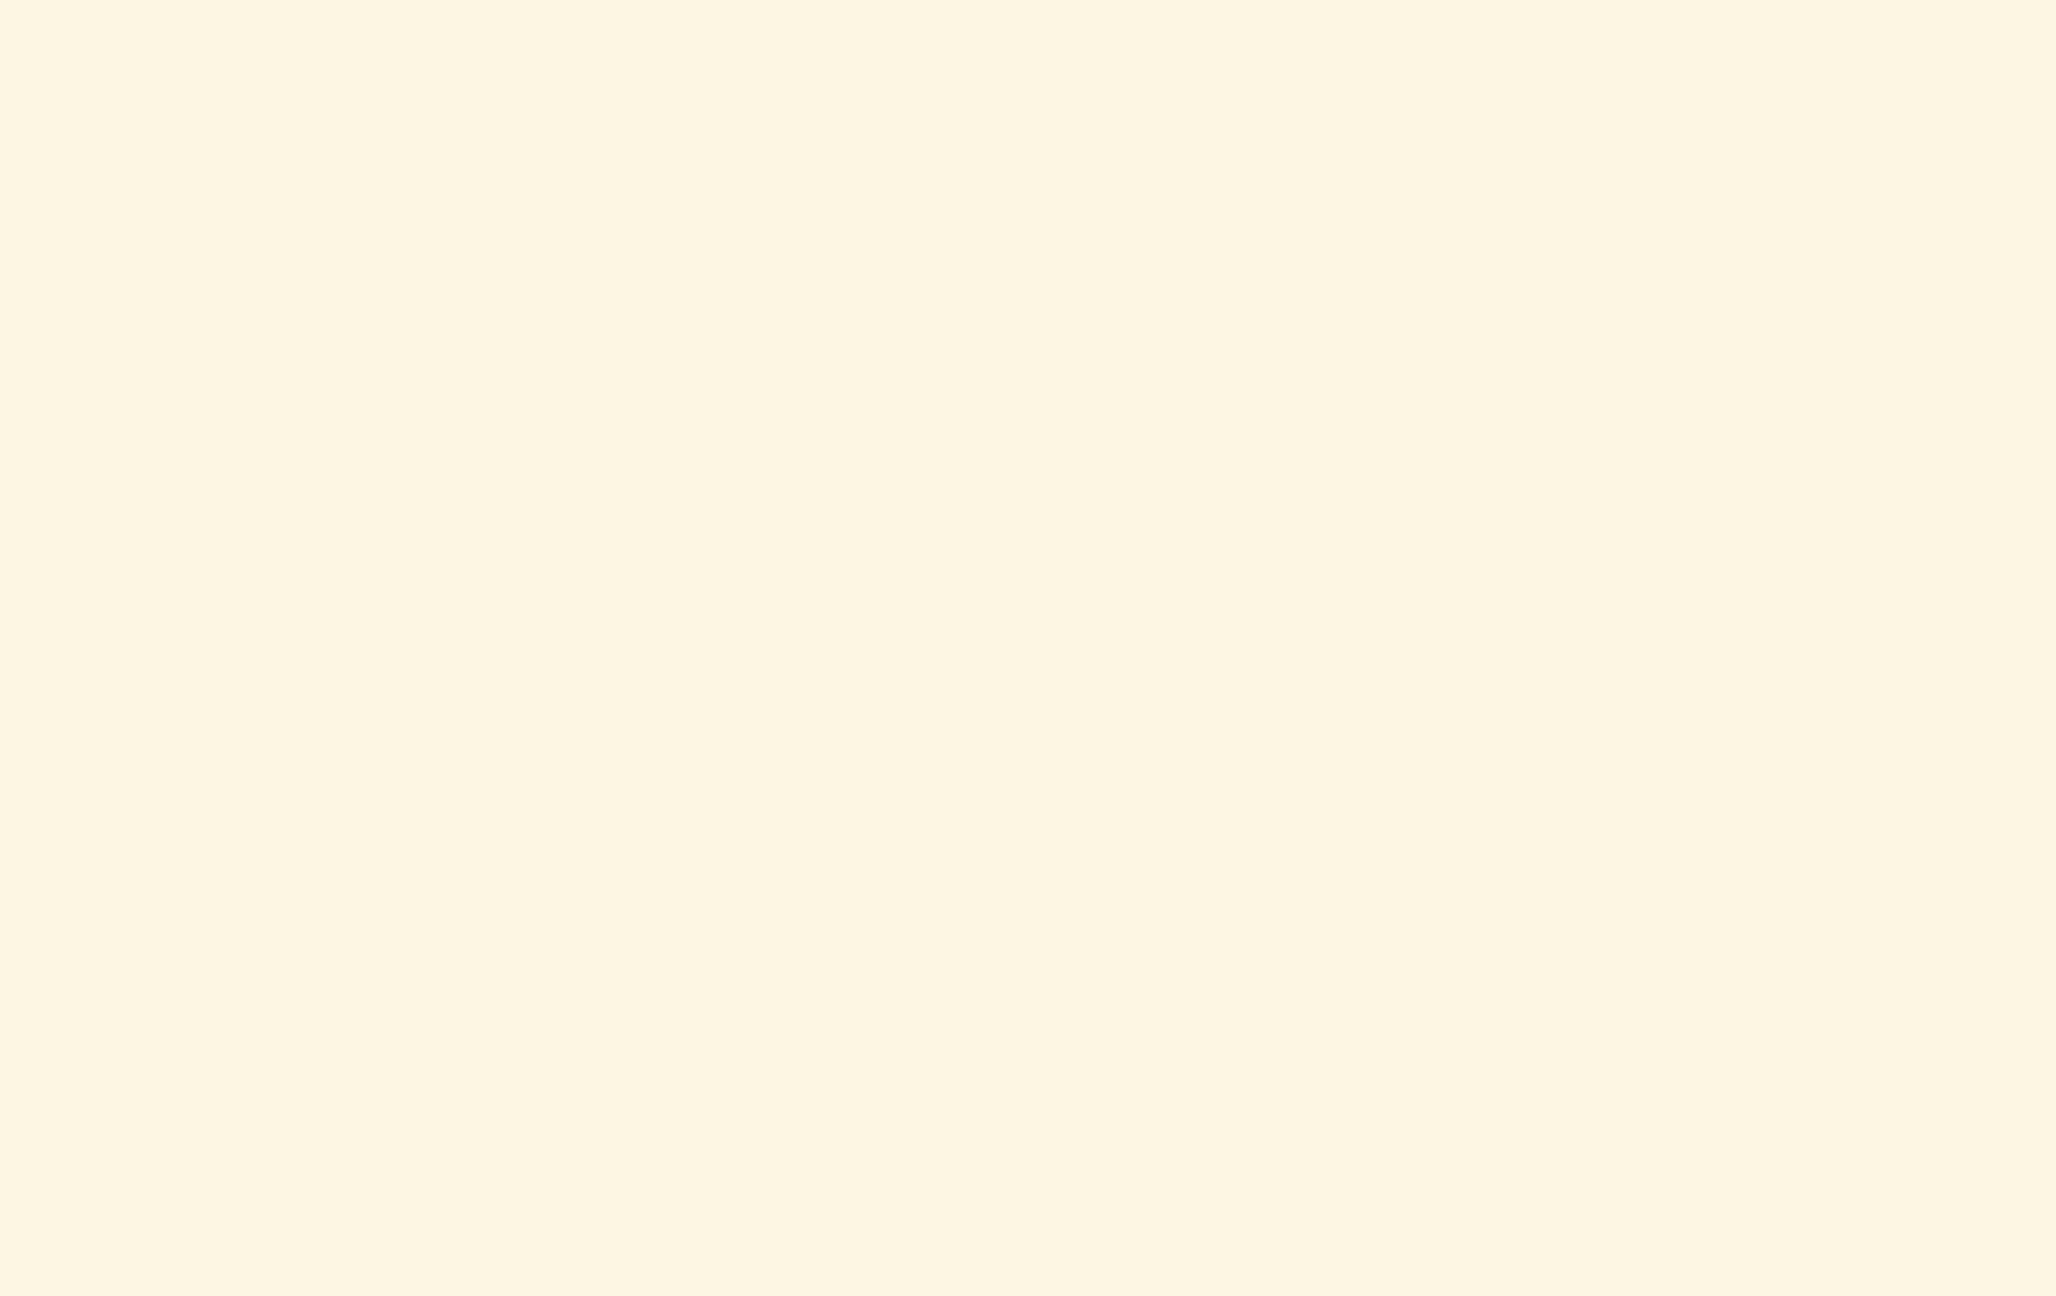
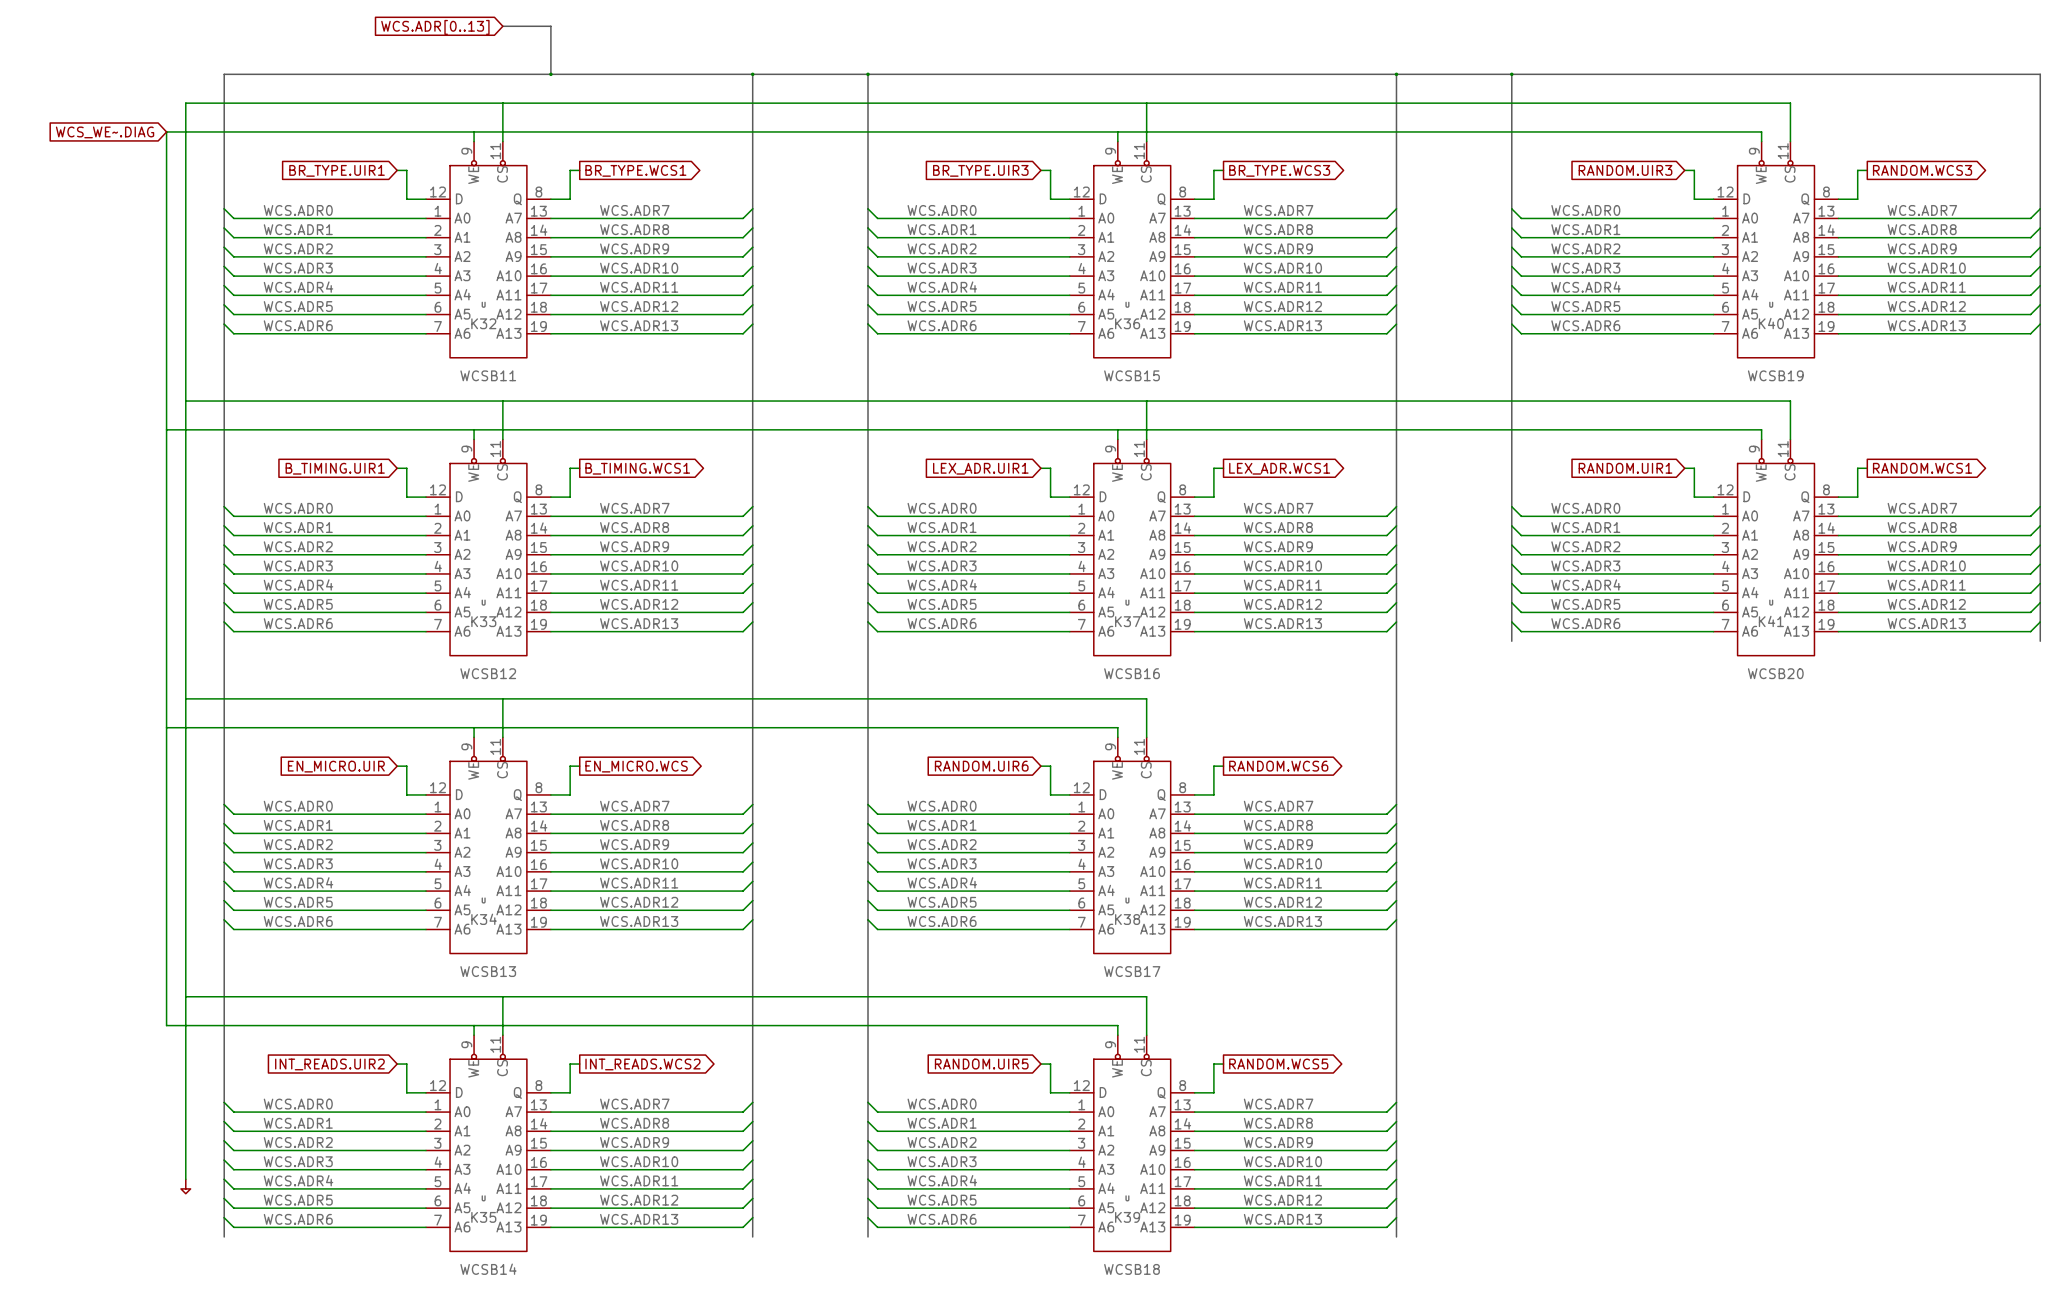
bus: none -> (502, 26) (550, 26) (550, 74)
global label: none -> WCS.ADR[0..13] (435, 27)
junction: none -> (550, 74)
bus: none -> (752, 74) (752, 1236)
junction: none -> (752, 74)
bus: none -> (868, 74) (868, 1236)
junction: none -> (868, 74)
bus: none -> (1396, 74) (1396, 1236)
junction: none -> (1396, 74)
bus: none -> (1511, 74) (1511, 641)
junction: none -> (1511, 74)
wire: none -> (502, 103) (502, 141)
wire: none -> (1146, 103) (1146, 141)
wire: none -> (474, 131) (474, 141)
wire: none -> (1117, 131) (1117, 141)
global label: none -> WCS_WE~.DIAG (105, 132)
wire: none -> (1761, 141) (1761, 131) (166, 131) (166, 1025) (1117, 1025) (1117, 1035)
wire: none -> (1790, 141) (1790, 103) (185, 103) (185, 1179)
global label: none -> BR_TYPE.UIR1 (337, 170)
wire: none -> (397, 170) (406, 170) (406, 199) (426, 199)
wire: none -> (579, 170) (570, 170) (570, 199) (550, 199)
global label: none -> BR_TYPE.WCS1 (635, 170)
global label: none -> BR_TYPE.UIR3 (980, 170)
wire: none -> (1040, 170) (1050, 170) (1050, 199) (1069, 199)
wire: none -> (1223, 170) (1213, 170) (1213, 199) (1194, 199)
global label: none -> BR_TYPE.WCS3 (1279, 170)
global label: none -> RANDOM.UIR3 (1625, 170)
wire: none -> (1684, 170) (1694, 170) (1694, 199) (1713, 199)
wire: none -> (1867, 170) (1857, 170) (1857, 199) (1838, 199)
global label: none -> RANDOM.WCS3 (1922, 170)
wire: none -> (224, 208) (233, 218) (426, 218)
wire: none -> (752, 208) (743, 218) (550, 218)
wire: none -> (868, 208) (877, 218) (1069, 218)
wire: none -> (1396, 208) (1386, 218) (1194, 218)
wire: none -> (1511, 208) (1521, 218) (1713, 218)
wire: none -> (2040, 208) (2030, 218) (1838, 218)
label: none -> WCS.ADR0 (298, 210)
label: none -> WCS.ADR7 (634, 210)
label: none -> WCS.ADR0 (942, 210)
label: none -> WCS.ADR7 (1278, 210)
label: none -> WCS.ADR0 (1585, 210)
label: none -> WCS.ADR7 (1922, 210)
wire: none -> (224, 228) (233, 237) (426, 237)
wire: none -> (752, 228) (743, 237) (550, 237)
wire: none -> (868, 228) (877, 237) (1069, 237)
wire: none -> (1396, 228) (1386, 237) (1194, 237)
wire: none -> (1511, 228) (1521, 237) (1713, 237)
wire: none -> (2040, 228) (2030, 237) (1838, 237)
label: none -> WCS.ADR1 (298, 229)
label: none -> WCS.ADR8 (634, 229)
label: none -> WCS.ADR1 (942, 229)
label: none -> WCS.ADR8 (1278, 229)
label: none -> WCS.ADR1 (1585, 229)
label: none -> WCS.ADR8 (1922, 229)
wire: none -> (224, 247) (233, 256) (426, 256)
wire: none -> (752, 247) (743, 256) (550, 256)
wire: none -> (868, 247) (877, 256) (1069, 256)
wire: none -> (1396, 247) (1386, 256) (1194, 256)
wire: none -> (1511, 247) (1521, 256) (1713, 256)
wire: none -> (2040, 247) (2030, 256) (1838, 256)
label: none -> WCS.ADR2 (298, 248)
label: none -> WCS.ADR9 (634, 248)
label: none -> WCS.ADR2 (942, 248)
label: none -> WCS.ADR9 (1278, 248)
label: none -> WCS.ADR2 (1585, 248)
label: none -> WCS.ADR9 (1922, 248)
part: none -> (488, 249)
part: none -> (1132, 249)
part: none -> (1776, 249)
wire: none -> (224, 266) (233, 276) (426, 276)
wire: none -> (752, 266) (743, 276) (550, 276)
wire: none -> (868, 266) (877, 276) (1069, 276)
wire: none -> (1396, 266) (1386, 276) (1194, 276)
wire: none -> (1511, 266) (1521, 276) (1713, 276)
wire: none -> (2040, 266) (2030, 276) (1838, 276)
label: none -> WCS.ADR3 (298, 268)
label: none -> WCS.ADR10 (639, 268)
label: none -> WCS.ADR3 (942, 268)
label: none -> WCS.ADR10 (1282, 268)
label: none -> WCS.ADR3 (1585, 268)
label: none -> WCS.ADR10 (1926, 268)
wire: none -> (224, 285) (233, 295) (426, 295)
wire: none -> (752, 285) (743, 295) (550, 295)
wire: none -> (868, 285) (877, 295) (1069, 295)
wire: none -> (1396, 285) (1386, 295) (1194, 295)
wire: none -> (1511, 285) (1521, 295) (1713, 295)
wire: none -> (2040, 285) (2030, 295) (1838, 295)
label: none -> WCS.ADR4 (298, 287)
label: none -> WCS.ADR11 (639, 287)
label: none -> WCS.ADR4 (942, 287)
label: none -> WCS.ADR11 (1282, 287)
label: none -> WCS.ADR4 (1586, 287)
label: none -> WCS.ADR11 (1926, 287)
wire: none -> (224, 304) (233, 314) (426, 314)
wire: none -> (752, 304) (743, 314) (550, 314)
wire: none -> (868, 304) (877, 314) (1069, 314)
wire: none -> (1396, 304) (1386, 314) (1194, 314)
wire: none -> (1511, 304) (1521, 314) (1713, 314)
wire: none -> (2040, 304) (2030, 314) (1838, 314)
label: none -> WCS.ADR5 (298, 306)
label: none -> WCS.ADR12 (639, 306)
label: none -> WCS.ADR5 (942, 306)
label: none -> WCS.ADR12 (1282, 306)
label: none -> WCS.ADR5 (1585, 306)
label: none -> WCS.ADR12 (1926, 306)
wire: none -> (224, 324) (233, 333) (426, 333)
wire: none -> (752, 324) (743, 333) (550, 333)
wire: none -> (868, 324) (877, 333) (1069, 333)
wire: none -> (1396, 324) (1386, 333) (1194, 333)
wire: none -> (1511, 324) (1521, 333) (1713, 333)
wire: none -> (2040, 324) (2030, 333) (1838, 333)
label: none -> WCS.ADR6 (298, 325)
label: none -> WCS.ADR13 (639, 325)
label: none -> WCS.ADR6 (942, 325)
label: none -> WCS.ADR13 (1282, 325)
label: none -> WCS.ADR6 (1585, 325)
label: none -> WCS.ADR13 (1926, 325)
wire: none -> (185, 401) (1790, 401) (1790, 439)
wire: none -> (502, 401) (502, 439)
wire: none -> (1146, 401) (1146, 439)
wire: none -> (166, 429) (1761, 429) (1761, 439)
wire: none -> (474, 429) (474, 439)
wire: none -> (1117, 429) (1117, 439)
global label: none -> B_TIMING.UIR1 (335, 468)
wire: none -> (397, 468) (406, 468) (406, 497) (426, 497)
wire: none -> (579, 468) (570, 468) (570, 497) (550, 497)
global label: none -> B_TIMING.WCS1 (637, 468)
global label: none -> LEX_ADR.UIR1 (980, 468)
wire: none -> (1040, 468) (1050, 468) (1050, 497) (1069, 497)
wire: none -> (1223, 468) (1213, 468) (1213, 497) (1194, 497)
global label: none -> LEX_ADR.WCS1 (1279, 468)
global label: none -> RANDOM.UIR1 (1625, 468)
wire: none -> (1684, 468) (1694, 468) (1694, 497) (1713, 497)
wire: none -> (1867, 468) (1857, 468) (1857, 497) (1838, 497)
global label: none -> RANDOM.WCS1 (1922, 468)
wire: none -> (224, 506) (233, 516) (426, 516)
wire: none -> (752, 506) (743, 516) (550, 516)
wire: none -> (868, 506) (877, 516) (1069, 516)
wire: none -> (1396, 506) (1386, 516) (1194, 516)
wire: none -> (1511, 506) (1521, 516) (1713, 516)
wire: none -> (2040, 506) (2030, 516) (1838, 516)
label: none -> WCS.ADR0 (298, 508)
label: none -> WCS.ADR7 (634, 508)
label: none -> WCS.ADR0 (942, 508)
label: none -> WCS.ADR7 (1278, 508)
label: none -> WCS.ADR0 (1585, 508)
label: none -> WCS.ADR7 (1922, 508)
wire: none -> (224, 525) (233, 535) (426, 535)
wire: none -> (752, 525) (743, 535) (550, 535)
wire: none -> (868, 525) (877, 535) (1069, 535)
wire: none -> (1396, 525) (1386, 535) (1194, 535)
wire: none -> (1511, 525) (1521, 535) (1713, 535)
wire: none -> (2040, 525) (2030, 535) (1838, 535)
label: none -> WCS.ADR1 (298, 527)
label: none -> WCS.ADR8 (634, 527)
label: none -> WCS.ADR1 (942, 527)
label: none -> WCS.ADR8 (1278, 527)
label: none -> WCS.ADR1 (1585, 527)
label: none -> WCS.ADR8 (1922, 527)
wire: none -> (224, 545) (233, 554) (426, 554)
wire: none -> (752, 545) (743, 554) (550, 554)
wire: none -> (868, 545) (877, 554) (1069, 554)
wire: none -> (1396, 545) (1386, 554) (1194, 554)
wire: none -> (1511, 545) (1521, 554) (1713, 554)
wire: none -> (2040, 545) (2030, 554) (1838, 554)
label: none -> WCS.ADR2 (298, 546)
label: none -> WCS.ADR9 (634, 546)
label: none -> WCS.ADR2 (942, 546)
label: none -> WCS.ADR9 (1278, 546)
label: none -> WCS.ADR2 (1585, 546)
label: none -> WCS.ADR9 (1922, 546)
part: none -> (488, 547)
part: none -> (1132, 547)
part: none -> (1776, 547)
wire: none -> (224, 564) (233, 573) (426, 573)
wire: none -> (752, 564) (743, 573) (550, 573)
wire: none -> (868, 564) (877, 573) (1069, 573)
wire: none -> (1396, 564) (1386, 573) (1194, 573)
wire: none -> (1511, 564) (1521, 573) (1713, 573)
wire: none -> (2040, 564) (2030, 573) (1838, 573)
label: none -> WCS.ADR3 (298, 565)
label: none -> WCS.ADR10 (639, 565)
label: none -> WCS.ADR3 (942, 565)
label: none -> WCS.ADR10 (1282, 565)
label: none -> WCS.ADR3 (1585, 565)
label: none -> WCS.ADR10 (1926, 565)
wire: none -> (224, 583) (233, 593) (426, 593)
wire: none -> (752, 583) (743, 593) (550, 593)
wire: none -> (868, 583) (877, 593) (1069, 593)
wire: none -> (1396, 583) (1386, 593) (1194, 593)
wire: none -> (1511, 583) (1521, 593) (1713, 593)
wire: none -> (2040, 583) (2030, 593) (1838, 593)
label: none -> WCS.ADR4 (298, 584)
label: none -> WCS.ADR4 (942, 584)
label: none -> WCS.ADR4 (1586, 584)
label: none -> WCS.ADR11 (639, 585)
label: none -> WCS.ADR11 (1282, 585)
label: none -> WCS.ADR11 (1926, 585)
wire: none -> (224, 602) (233, 612) (426, 612)
wire: none -> (752, 602) (743, 612) (550, 612)
wire: none -> (868, 602) (877, 612) (1069, 612)
wire: none -> (1396, 602) (1386, 612) (1194, 612)
wire: none -> (1511, 602) (1521, 612) (1713, 612)
wire: none -> (2040, 602) (2030, 612) (1838, 612)
label: none -> WCS.ADR5 (298, 604)
label: none -> WCS.ADR12 (639, 604)
label: none -> WCS.ADR5 (942, 604)
label: none -> WCS.ADR12 (1282, 604)
label: none -> WCS.ADR5 (1585, 604)
label: none -> WCS.ADR12 (1926, 604)
wire: none -> (224, 622) (233, 631) (426, 631)
wire: none -> (752, 622) (743, 631) (550, 631)
wire: none -> (868, 622) (877, 631) (1069, 631)
wire: none -> (1396, 622) (1386, 631) (1194, 631)
wire: none -> (1511, 622) (1521, 631) (1713, 631)
wire: none -> (2040, 622) (2030, 631) (1838, 631)
label: none -> WCS.ADR6 (298, 623)
label: none -> WCS.ADR13 (639, 623)
label: none -> WCS.ADR6 (942, 623)
label: none -> WCS.ADR13 (1282, 623)
label: none -> WCS.ADR6 (1585, 623)
label: none -> WCS.ADR13 (1926, 623)
bus: none -> (2040, 641) (2040, 74) (224, 74) (224, 1236)
wire: none -> (185, 698) (1146, 698) (1146, 737)
wire: none -> (502, 698) (502, 737)
wire: none -> (166, 727) (1117, 727) (1117, 737)
wire: none -> (474, 727) (474, 737)
global label: none -> EN_MICRO.UIR (336, 766)
wire: none -> (397, 766) (406, 766) (406, 794) (426, 794)
wire: none -> (579, 766) (570, 766) (570, 794) (550, 794)
global label: none -> EN_MICRO.WCS (636, 766)
global label: none -> RANDOM.UIR6 (981, 766)
wire: none -> (1040, 766) (1050, 766) (1050, 794) (1069, 794)
wire: none -> (1223, 766) (1213, 766) (1213, 794) (1194, 794)
global label: none -> RANDOM.WCS6 (1278, 766)
wire: none -> (224, 804) (233, 814) (426, 814)
wire: none -> (752, 804) (743, 814) (550, 814)
wire: none -> (868, 804) (877, 814) (1069, 814)
wire: none -> (1396, 804) (1386, 814) (1194, 814)
label: none -> WCS.ADR0 (298, 806)
label: none -> WCS.ADR7 (634, 806)
label: none -> WCS.ADR0 (942, 806)
label: none -> WCS.ADR7 (1278, 806)
wire: none -> (224, 823) (233, 833) (426, 833)
wire: none -> (752, 823) (743, 833) (550, 833)
wire: none -> (868, 823) (877, 833) (1069, 833)
wire: none -> (1396, 823) (1386, 833) (1194, 833)
label: none -> WCS.ADR1 (298, 825)
label: none -> WCS.ADR8 (634, 825)
label: none -> WCS.ADR1 (942, 825)
label: none -> WCS.ADR8 (1278, 825)
wire: none -> (224, 843) (233, 852) (426, 852)
wire: none -> (752, 843) (743, 852) (550, 852)
wire: none -> (868, 843) (877, 852) (1069, 852)
wire: none -> (1396, 843) (1386, 852) (1194, 852)
label: none -> WCS.ADR2 (298, 844)
label: none -> WCS.ADR9 (634, 844)
label: none -> WCS.ADR2 (942, 844)
label: none -> WCS.ADR9 (1278, 844)
part: none -> (488, 845)
part: none -> (1132, 845)
wire: none -> (224, 862) (233, 871) (426, 871)
wire: none -> (752, 862) (743, 871) (550, 871)
wire: none -> (868, 862) (877, 871) (1069, 871)
wire: none -> (1396, 862) (1386, 871) (1194, 871)
label: none -> WCS.ADR3 (298, 863)
label: none -> WCS.ADR10 (639, 863)
label: none -> WCS.ADR3 (942, 863)
label: none -> WCS.ADR10 (1282, 863)
wire: none -> (224, 881) (233, 891) (426, 891)
wire: none -> (752, 881) (743, 891) (550, 891)
wire: none -> (868, 881) (877, 891) (1069, 891)
wire: none -> (1396, 881) (1386, 891) (1194, 891)
label: none -> WCS.ADR4 (298, 882)
label: none -> WCS.ADR4 (942, 882)
label: none -> WCS.ADR11 (639, 883)
label: none -> WCS.ADR11 (1282, 883)
wire: none -> (224, 900) (233, 910) (426, 910)
wire: none -> (752, 900) (743, 910) (550, 910)
wire: none -> (868, 900) (877, 910) (1069, 910)
wire: none -> (1396, 900) (1386, 910) (1194, 910)
label: none -> WCS.ADR5 (298, 902)
label: none -> WCS.ADR12 (639, 902)
label: none -> WCS.ADR5 (942, 902)
label: none -> WCS.ADR12 (1282, 902)
wire: none -> (224, 919) (233, 929) (426, 929)
wire: none -> (752, 919) (743, 929) (550, 929)
wire: none -> (868, 919) (877, 929) (1069, 929)
wire: none -> (1396, 919) (1386, 929) (1194, 929)
label: none -> WCS.ADR6 (298, 921)
label: none -> WCS.ADR13 (639, 921)
label: none -> WCS.ADR6 (942, 921)
label: none -> WCS.ADR13 (1282, 921)
wire: none -> (185, 996) (1146, 996) (1146, 1035)
wire: none -> (502, 996) (502, 1035)
wire: none -> (474, 1025) (474, 1035)
global label: none -> INT_READS.UIR2 (329, 1064)
wire: none -> (397, 1064) (406, 1064) (406, 1092) (426, 1092)
wire: none -> (579, 1064) (570, 1064) (570, 1092) (550, 1092)
global label: none -> INT_READS.WCS2 (642, 1064)
global label: none -> RANDOM.UIR5 (981, 1064)
wire: none -> (1040, 1064) (1050, 1064) (1050, 1092) (1069, 1092)
wire: none -> (1223, 1064) (1213, 1064) (1213, 1092) (1194, 1092)
global label: none -> RANDOM.WCS5 (1278, 1064)
wire: none -> (224, 1102) (233, 1112) (426, 1112)
wire: none -> (752, 1102) (743, 1112) (550, 1112)
wire: none -> (868, 1102) (877, 1112) (1069, 1112)
wire: none -> (1396, 1102) (1386, 1112) (1194, 1112)
label: none -> WCS.ADR0 (298, 1104)
label: none -> WCS.ADR7 (634, 1104)
label: none -> WCS.ADR0 (942, 1104)
label: none -> WCS.ADR7 (1278, 1104)
wire: none -> (224, 1121) (233, 1131) (426, 1131)
wire: none -> (752, 1121) (743, 1131) (550, 1131)
wire: none -> (868, 1121) (877, 1131) (1069, 1131)
wire: none -> (1396, 1121) (1386, 1131) (1194, 1131)
label: none -> WCS.ADR1 (298, 1123)
label: none -> WCS.ADR8 (634, 1123)
label: none -> WCS.ADR1 (942, 1123)
label: none -> WCS.ADR8 (1278, 1123)
wire: none -> (224, 1140) (233, 1150) (426, 1150)
wire: none -> (752, 1140) (743, 1150) (550, 1150)
wire: none -> (868, 1140) (877, 1150) (1069, 1150)
wire: none -> (1396, 1140) (1386, 1150) (1194, 1150)
label: none -> WCS.ADR2 (298, 1142)
label: none -> WCS.ADR9 (634, 1142)
label: none -> WCS.ADR2 (942, 1142)
label: none -> WCS.ADR9 (1278, 1142)
part: none -> (488, 1143)
part: none -> (1132, 1143)
wire: none -> (224, 1160) (233, 1169) (426, 1169)
wire: none -> (752, 1160) (743, 1169) (550, 1169)
wire: none -> (868, 1160) (877, 1169) (1069, 1169)
wire: none -> (1396, 1160) (1386, 1169) (1194, 1169)
label: none -> WCS.ADR3 (298, 1161)
label: none -> WCS.ADR10 (639, 1161)
label: none -> WCS.ADR3 (942, 1161)
label: none -> WCS.ADR10 (1282, 1161)
wire: none -> (224, 1179) (233, 1188) (426, 1188)
wire: none -> (752, 1179) (743, 1188) (550, 1188)
wire: none -> (868, 1179) (877, 1188) (1069, 1188)
wire: none -> (1396, 1179) (1386, 1188) (1194, 1188)
label: none -> WCS.ADR4 (298, 1180)
label: none -> WCS.ADR11 (639, 1180)
label: none -> WCS.ADR4 (942, 1180)
label: none -> WCS.ADR11 (1282, 1180)
power symbol: none -> (185, 1186)
wire: none -> (224, 1198) (233, 1208) (426, 1208)
wire: none -> (752, 1198) (743, 1208) (550, 1208)
wire: none -> (868, 1198) (877, 1208) (1069, 1208)
wire: none -> (1396, 1198) (1386, 1208) (1194, 1208)
label: none -> WCS.ADR5 (298, 1200)
label: none -> WCS.ADR12 (639, 1200)
label: none -> WCS.ADR5 (942, 1200)
label: none -> WCS.ADR12 (1282, 1200)
wire: none -> (224, 1217) (233, 1227) (426, 1227)
wire: none -> (752, 1217) (743, 1227) (550, 1227)
wire: none -> (868, 1217) (877, 1227) (1069, 1227)
wire: none -> (1396, 1217) (1386, 1227) (1194, 1227)
label: none -> WCS.ADR6 (298, 1219)
label: none -> WCS.ADR13 (639, 1219)
label: none -> WCS.ADR6 (942, 1219)
label: none -> WCS.ADR13 (1282, 1219)

